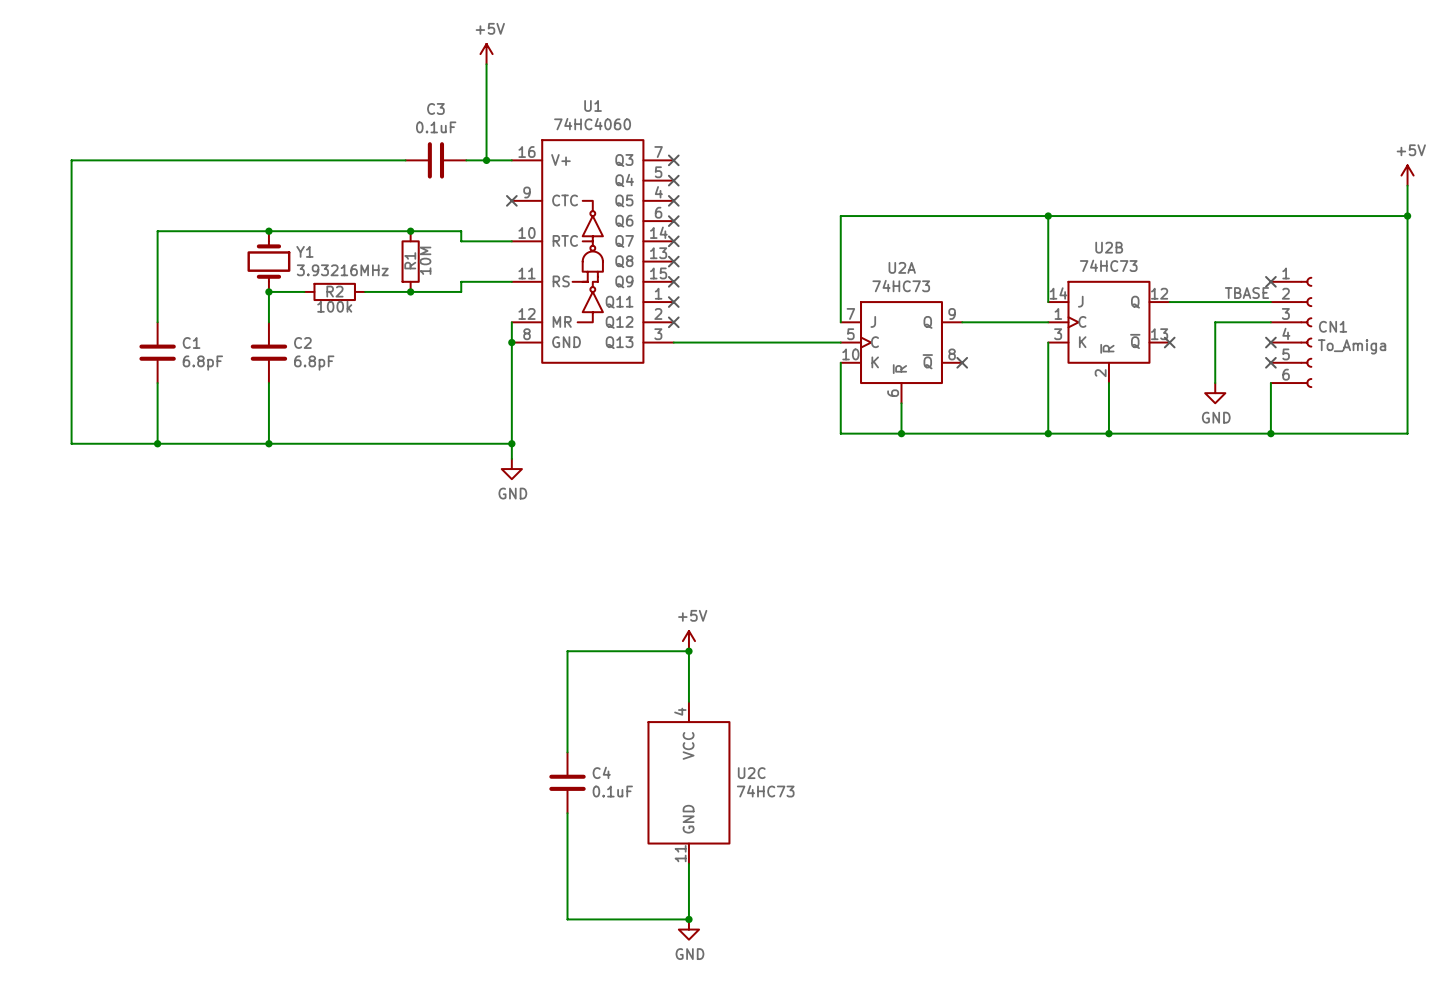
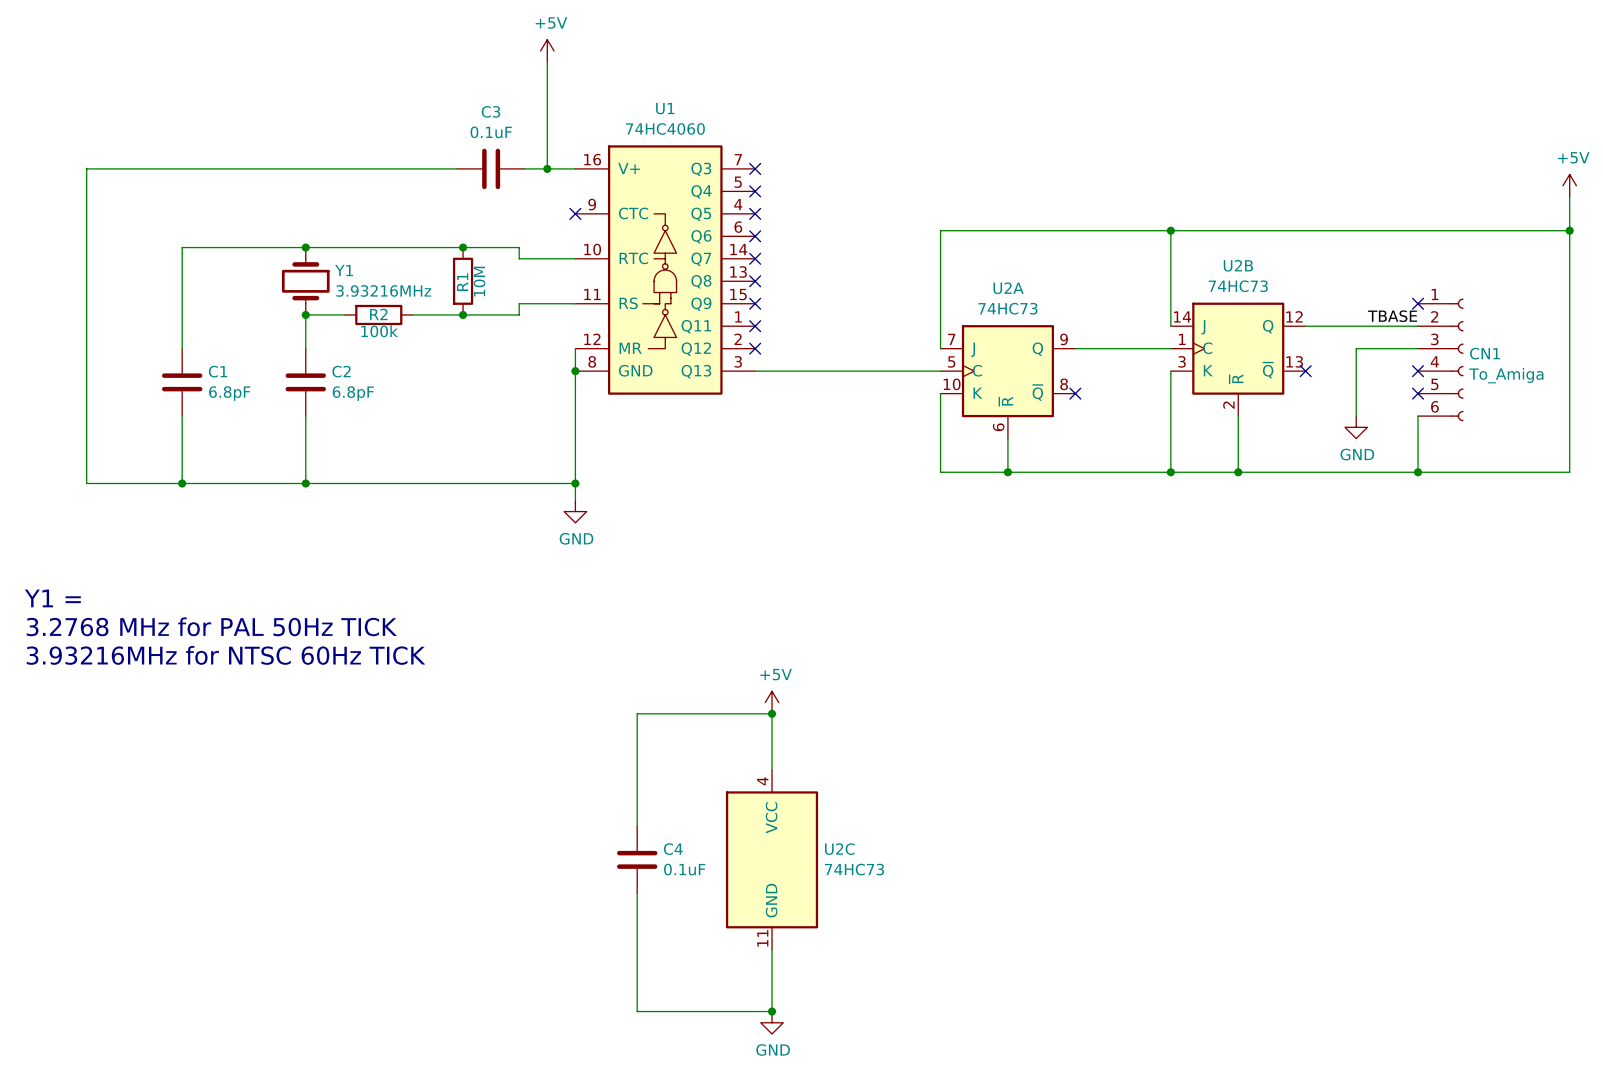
text: none -> Y1 = (52, 598)
text: none -> 3.2768 MHz for PAL 50Hz TICK (211, 626)
text: none -> 3.93216MHz for NTSC 60Hz TICK (226, 655)

